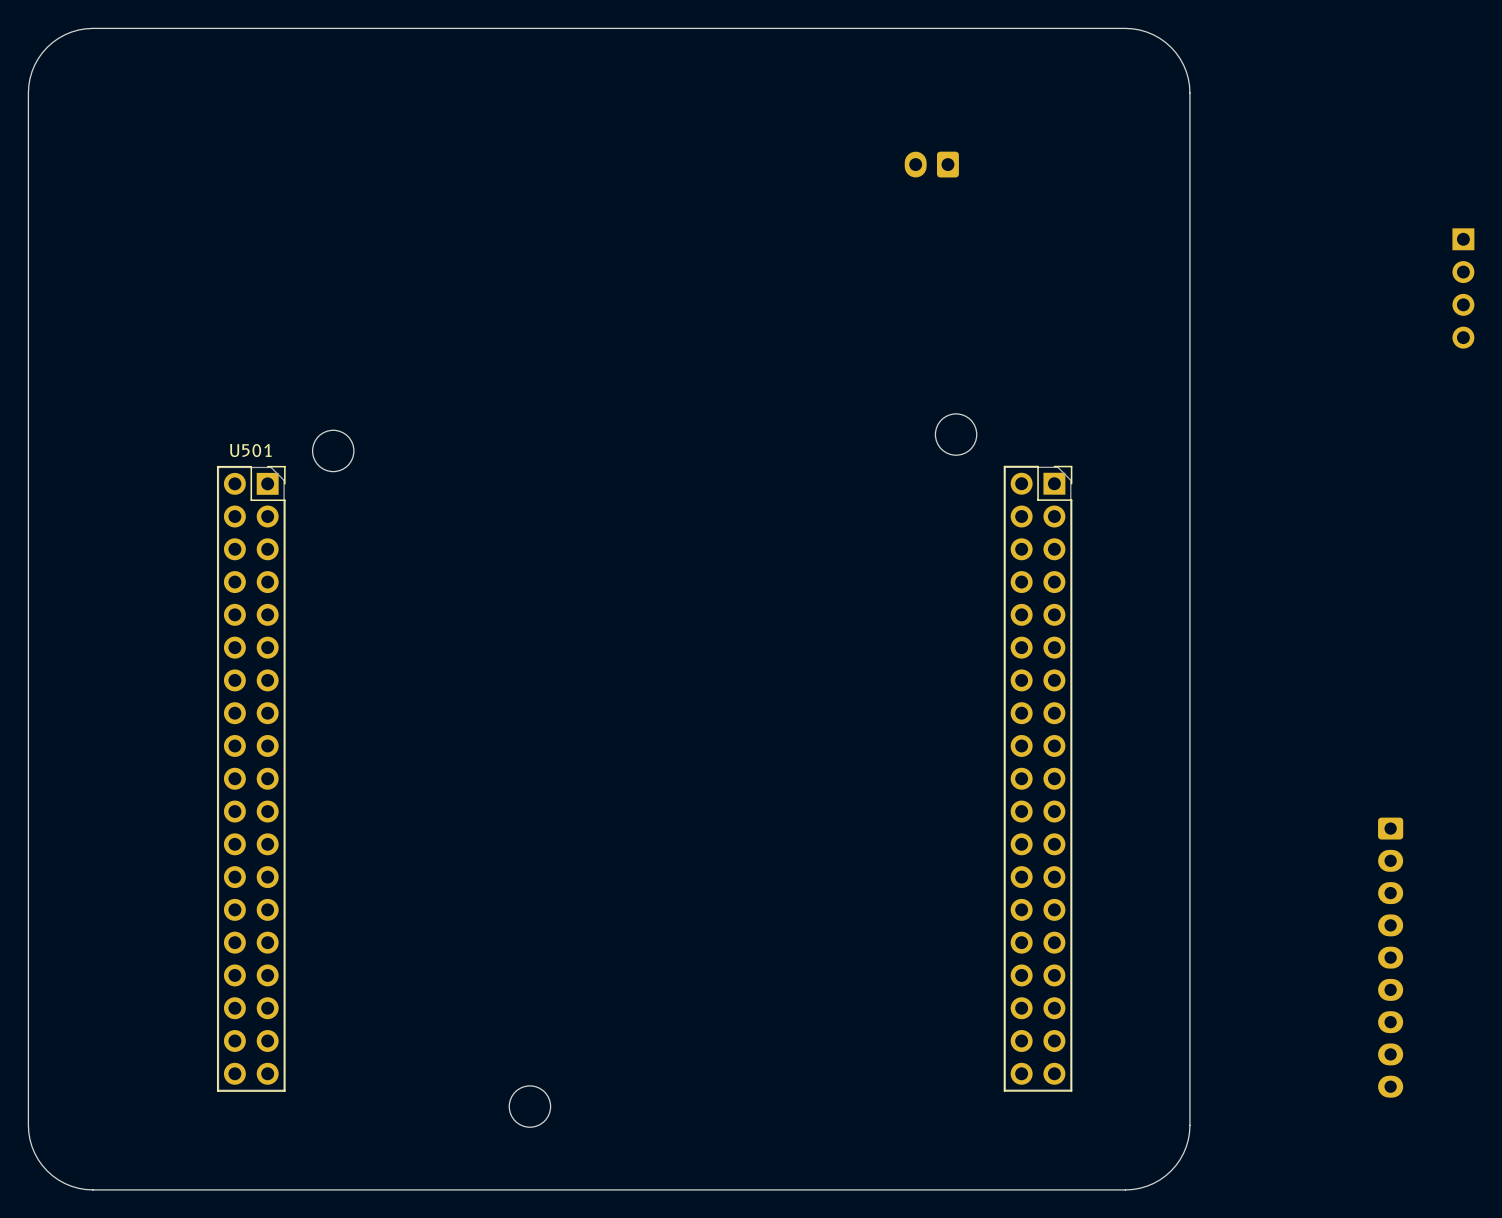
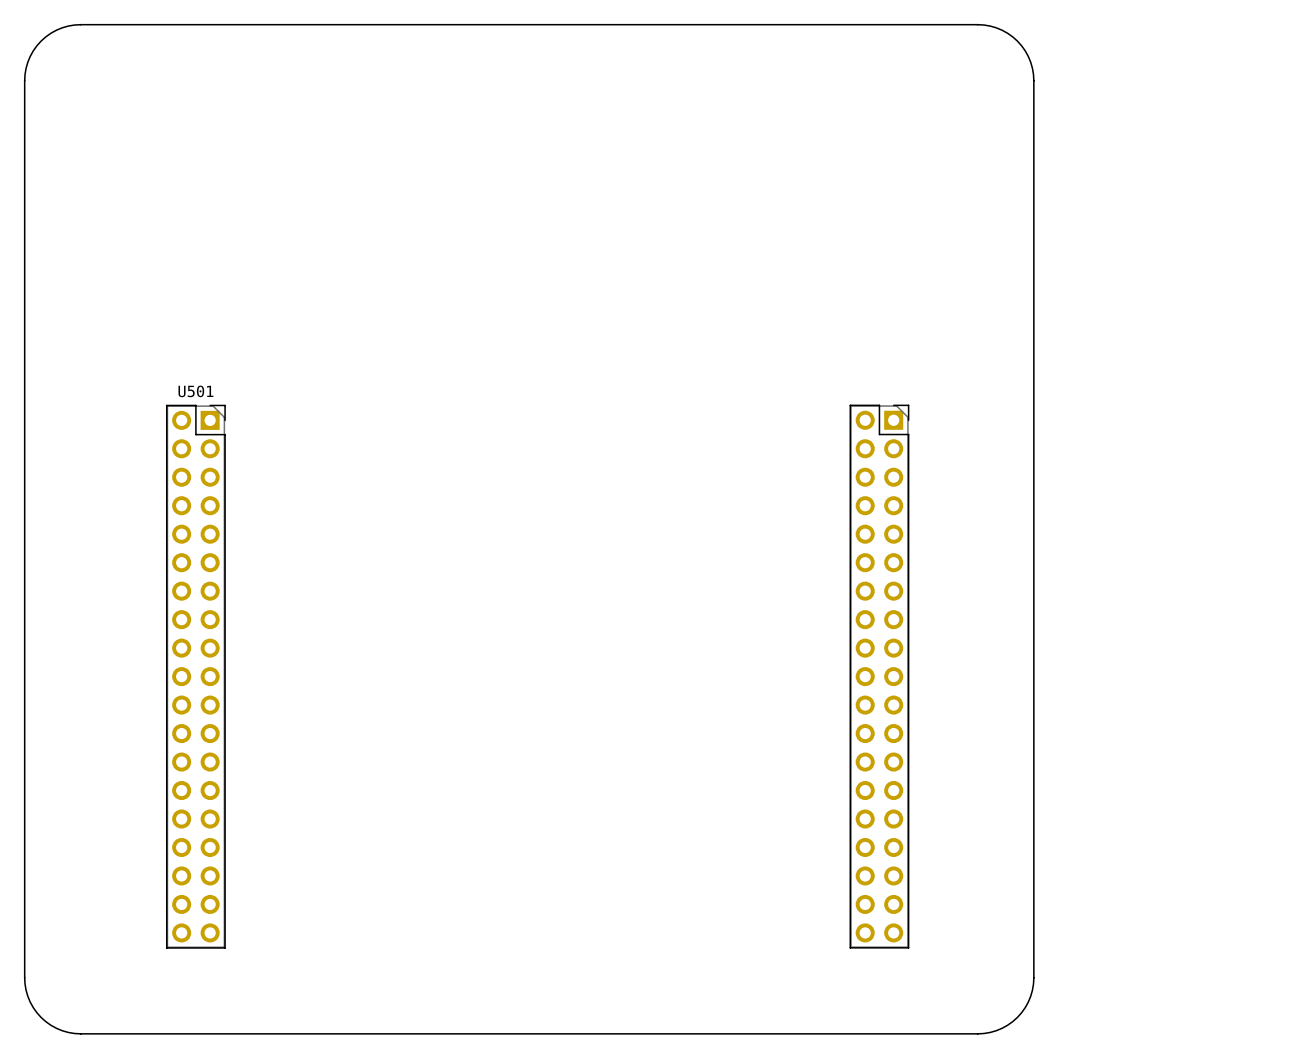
part: (931, 164) -> none
part: (1463, 288) -> none
U501 footprint: [216, 413, 1073, 1128] -> [166, 404, 910, 949]
part: (1390, 957) -> none

